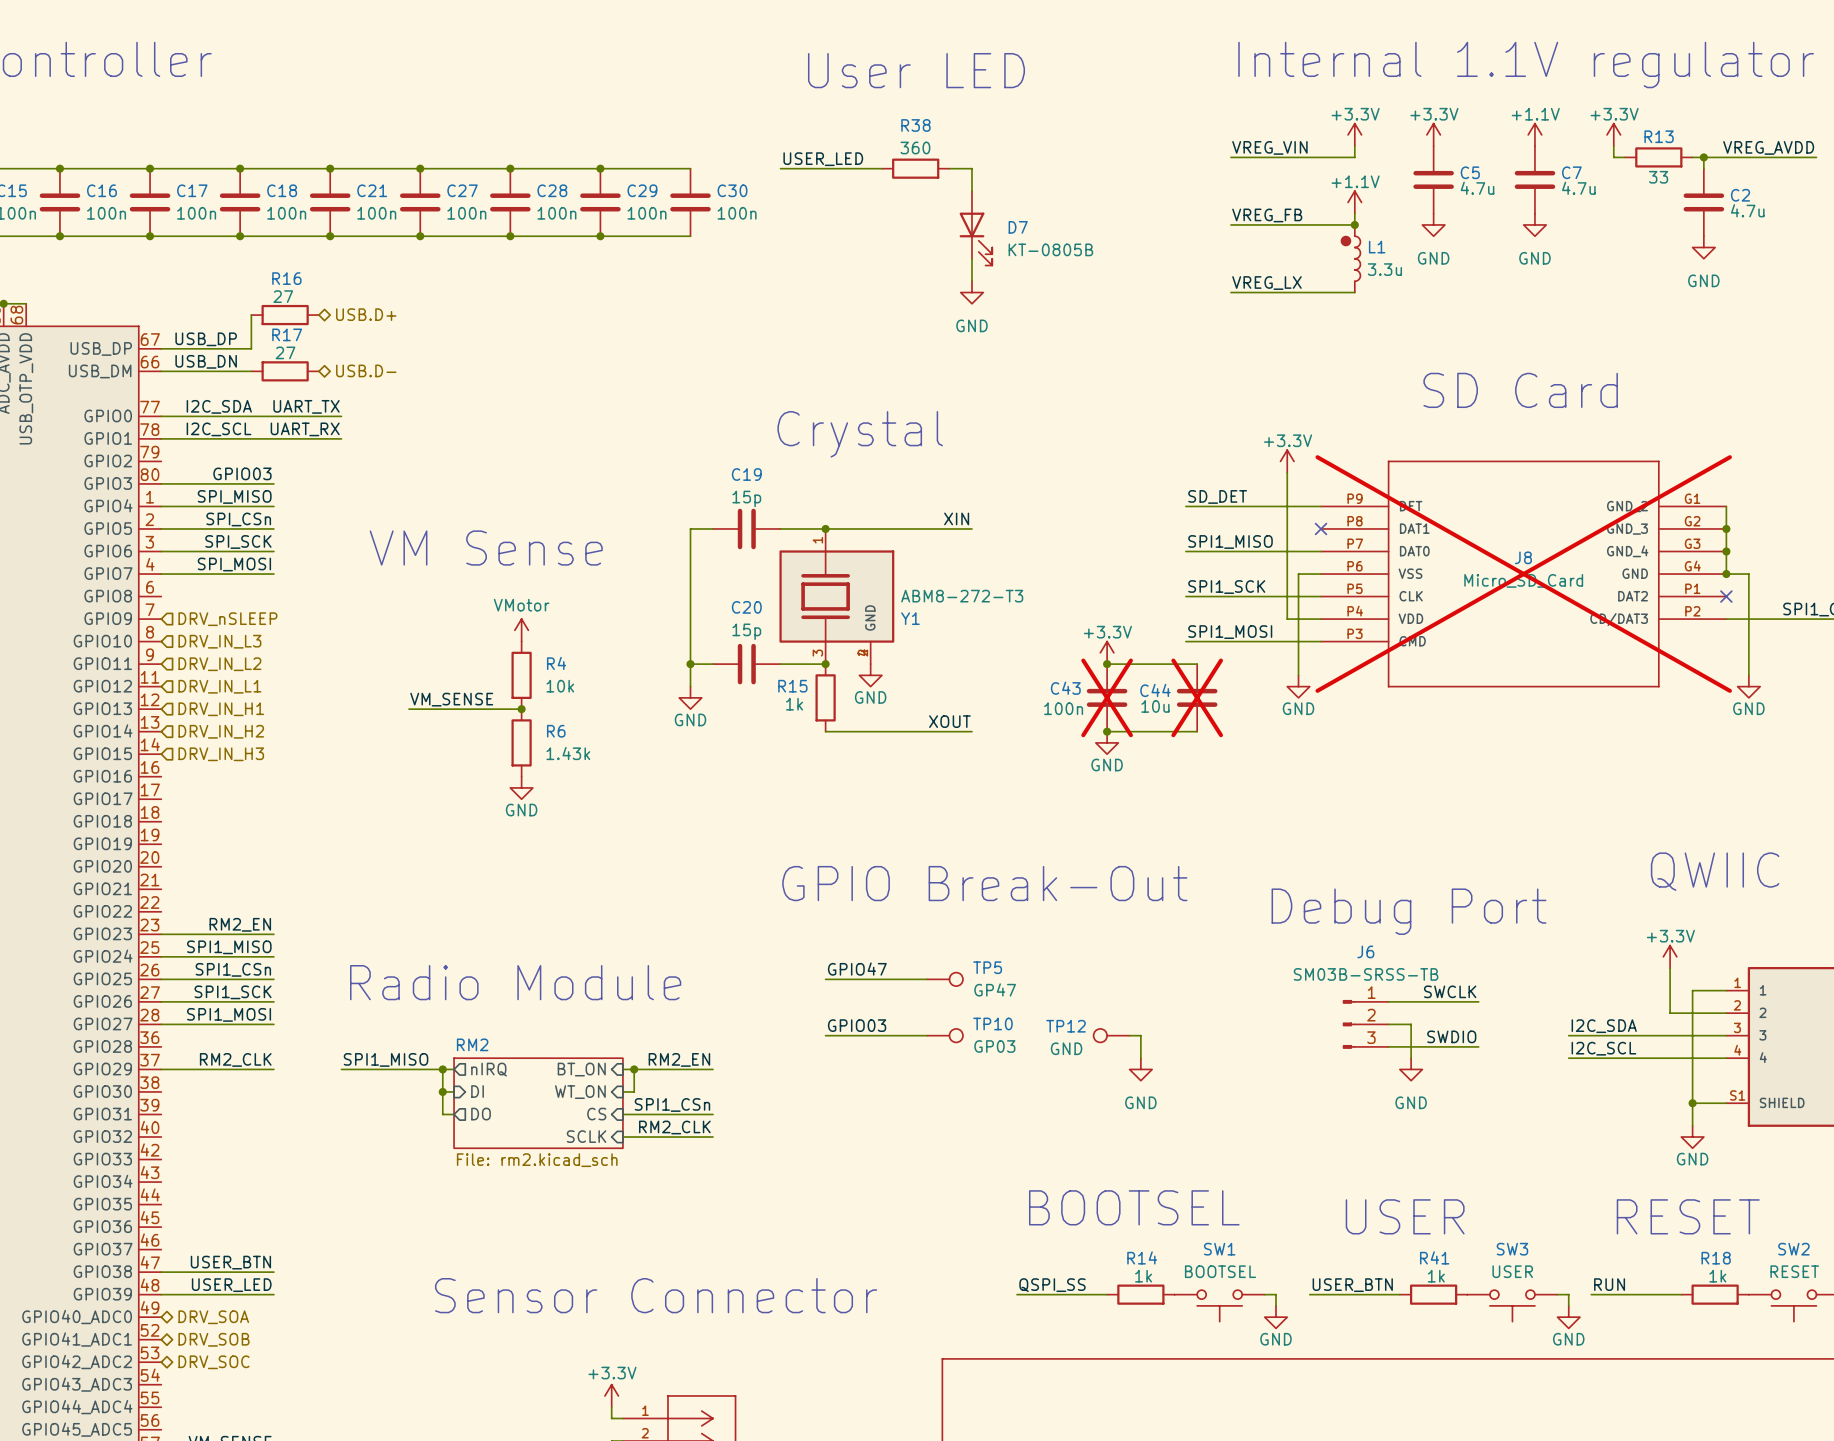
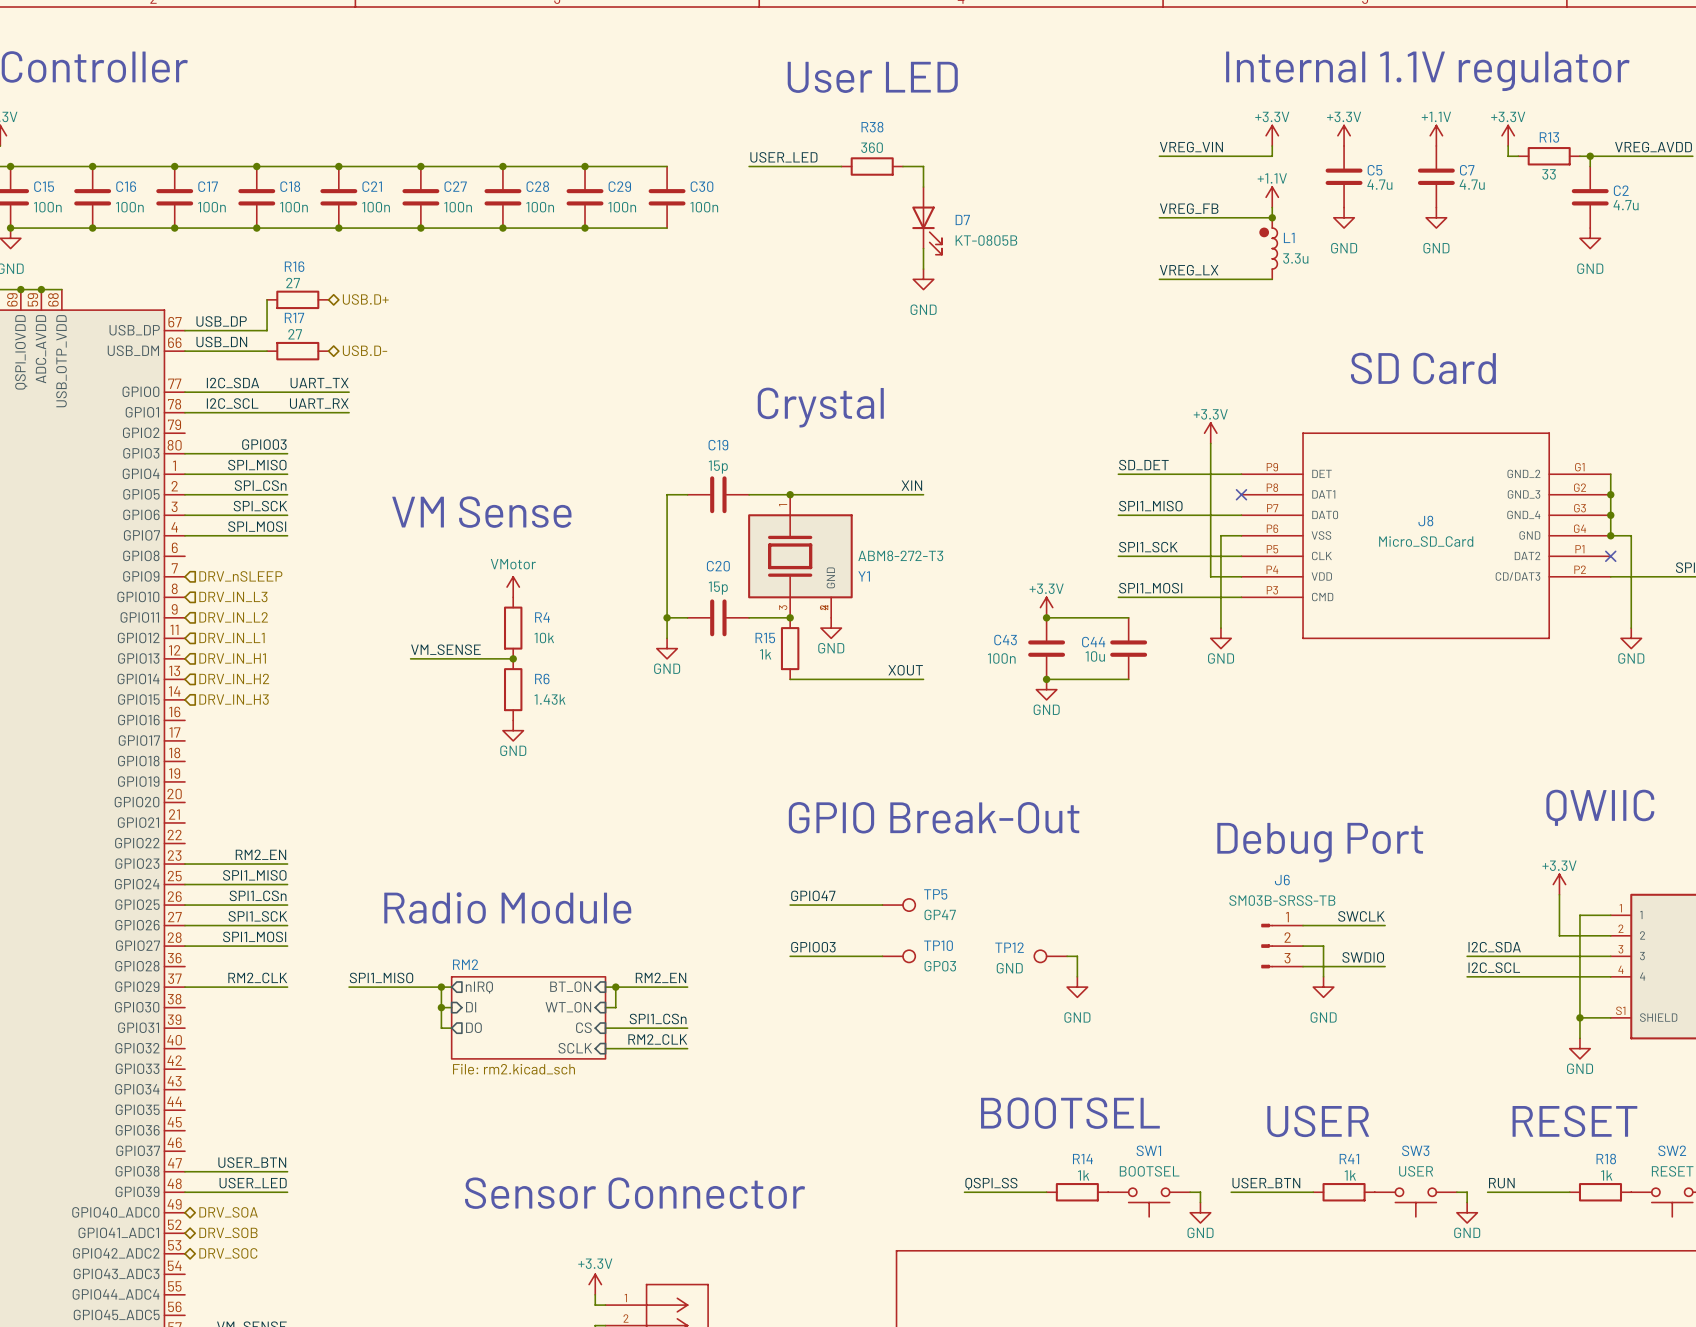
J8 do-not-place cross: (1523, 574) -> none
C43 do-not-place cross: (1107, 697) -> none
C44 do-not-place cross: (1197, 697) -> none

